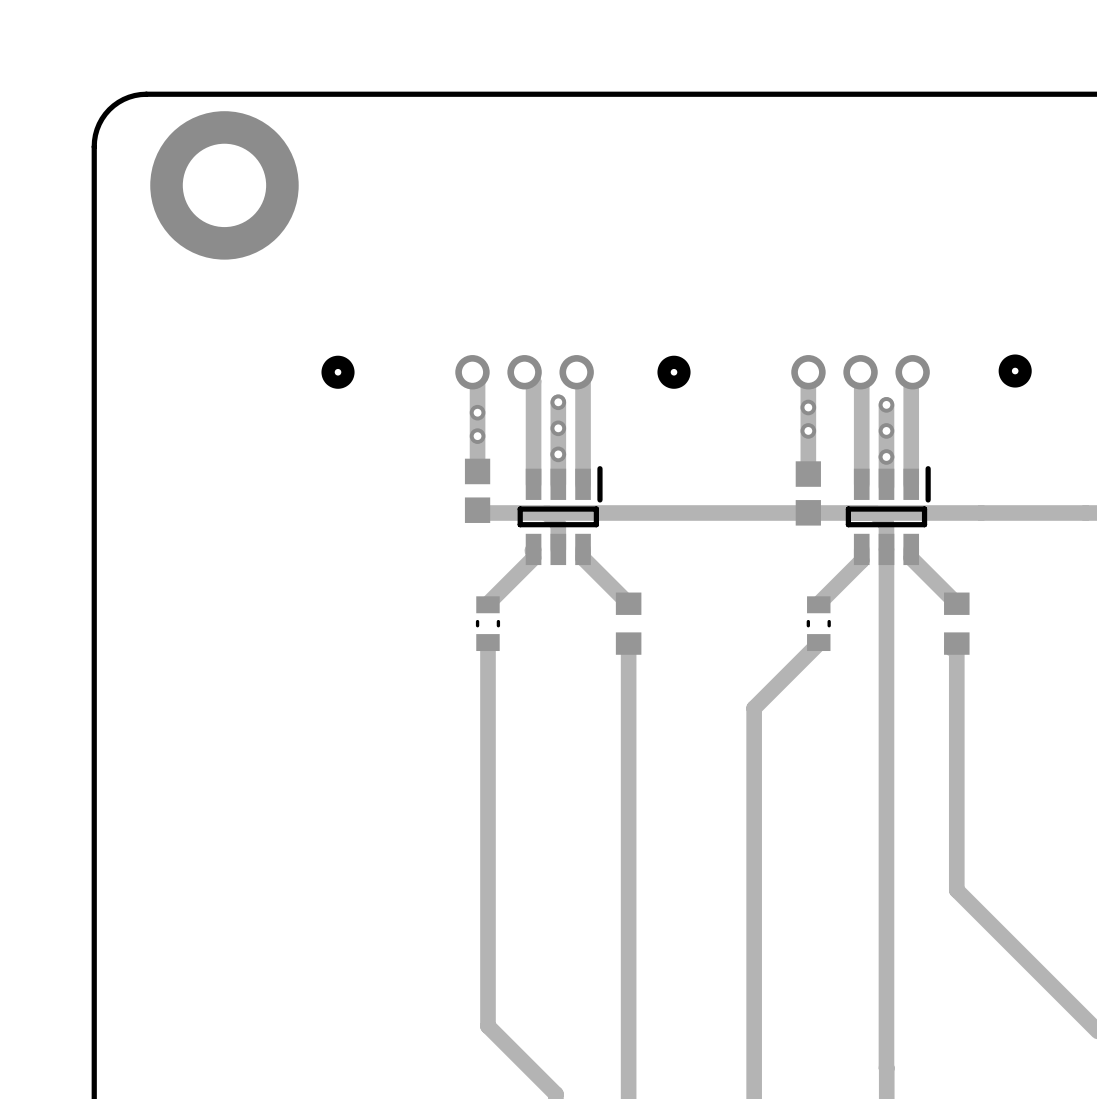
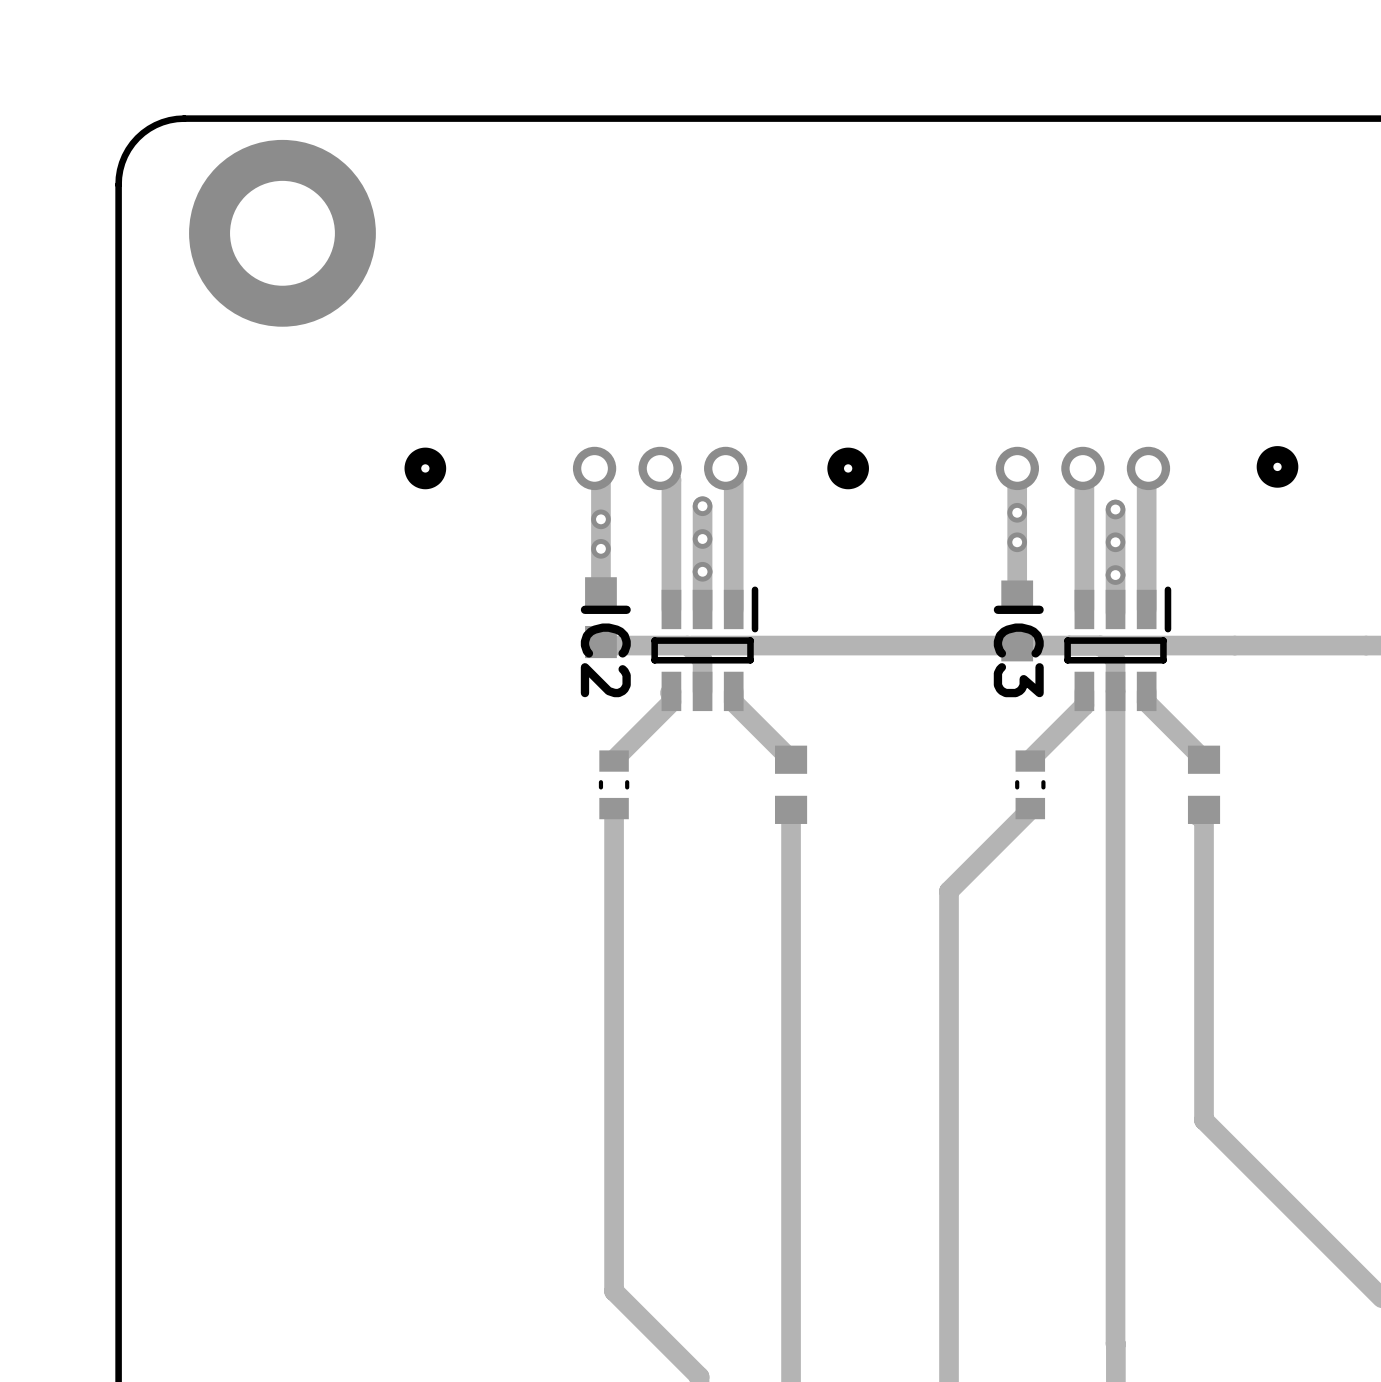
IC2 name: none -> IC2 (605, 651)
IC3 name: none -> IC3 (1018, 651)

